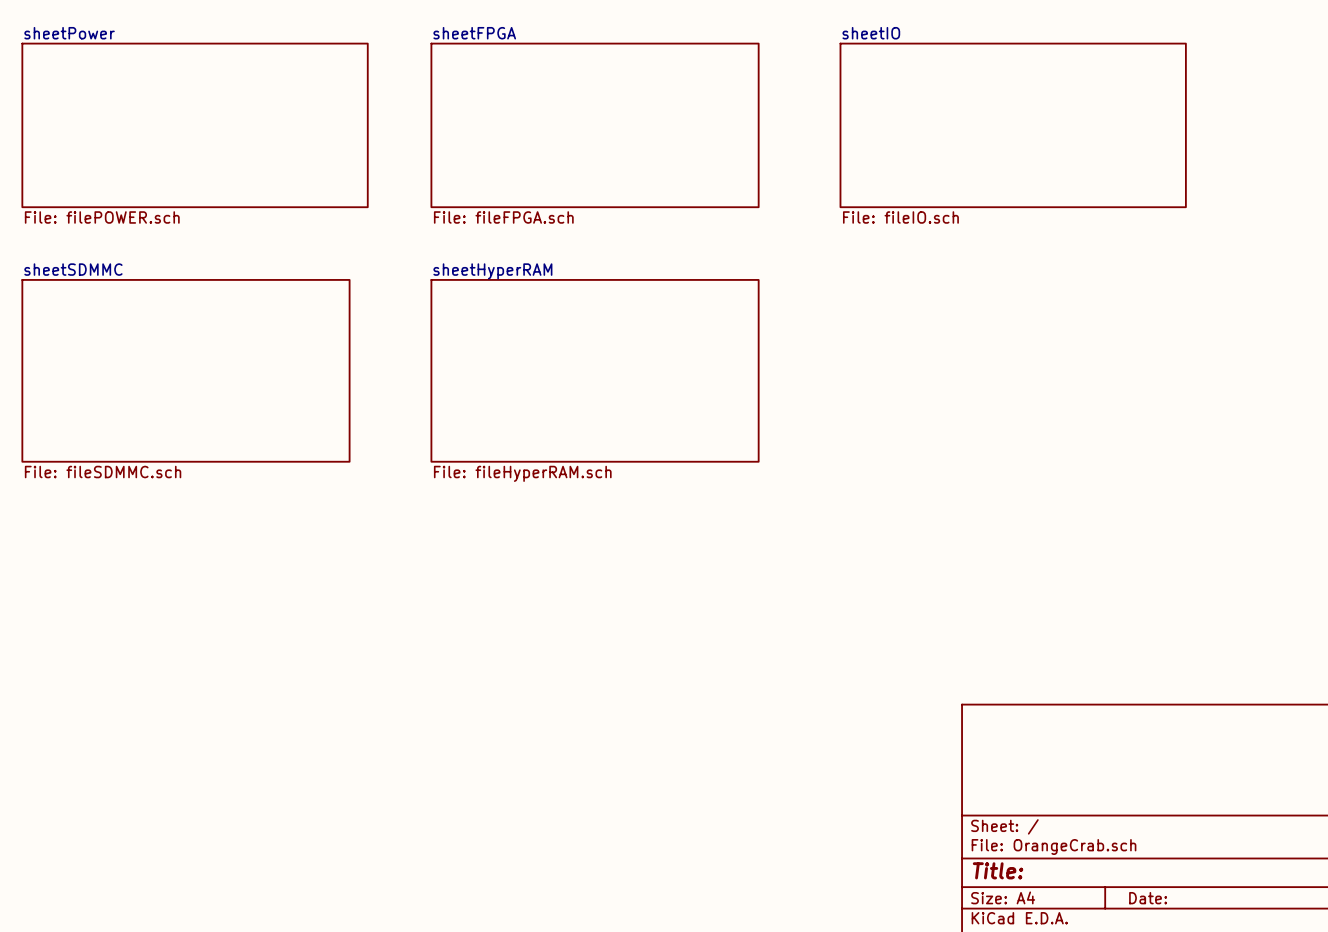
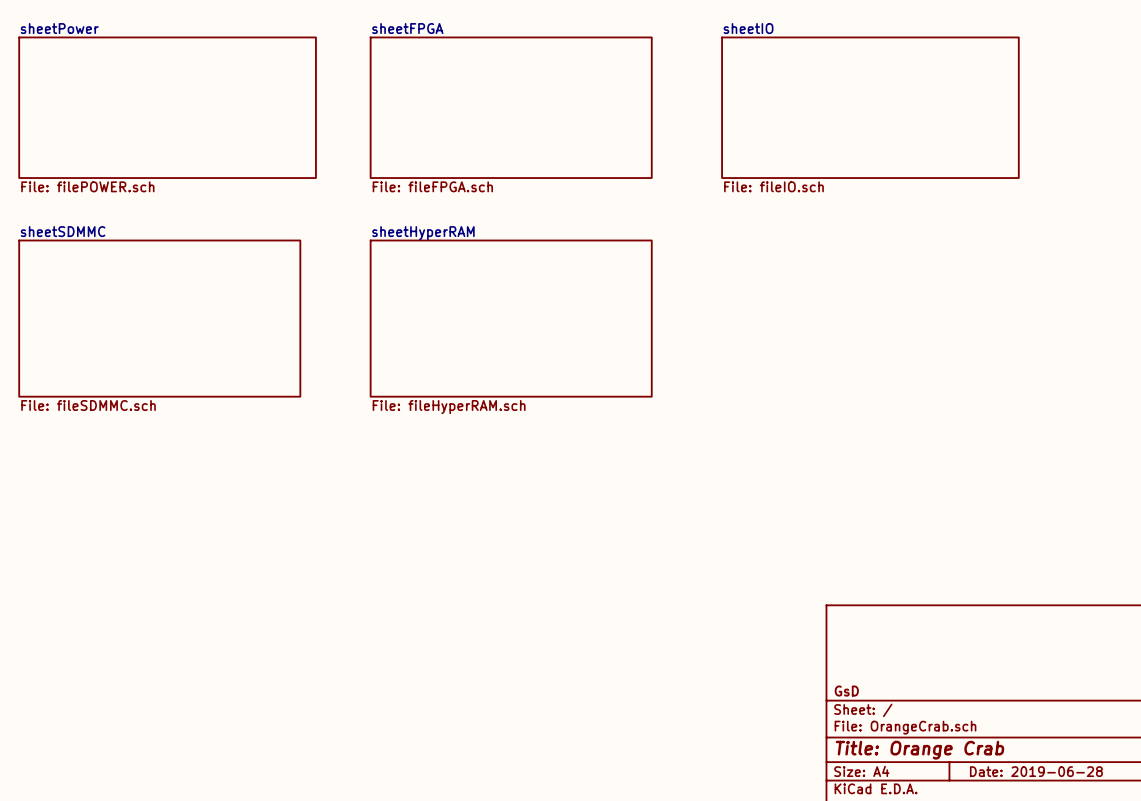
title block: none -> GsD (846, 691)
title block: Title: (998, 870) -> Title: Orange Crab (920, 750)
title block: Date: (1148, 898) -> Date: 2019-06-28 (1036, 771)

